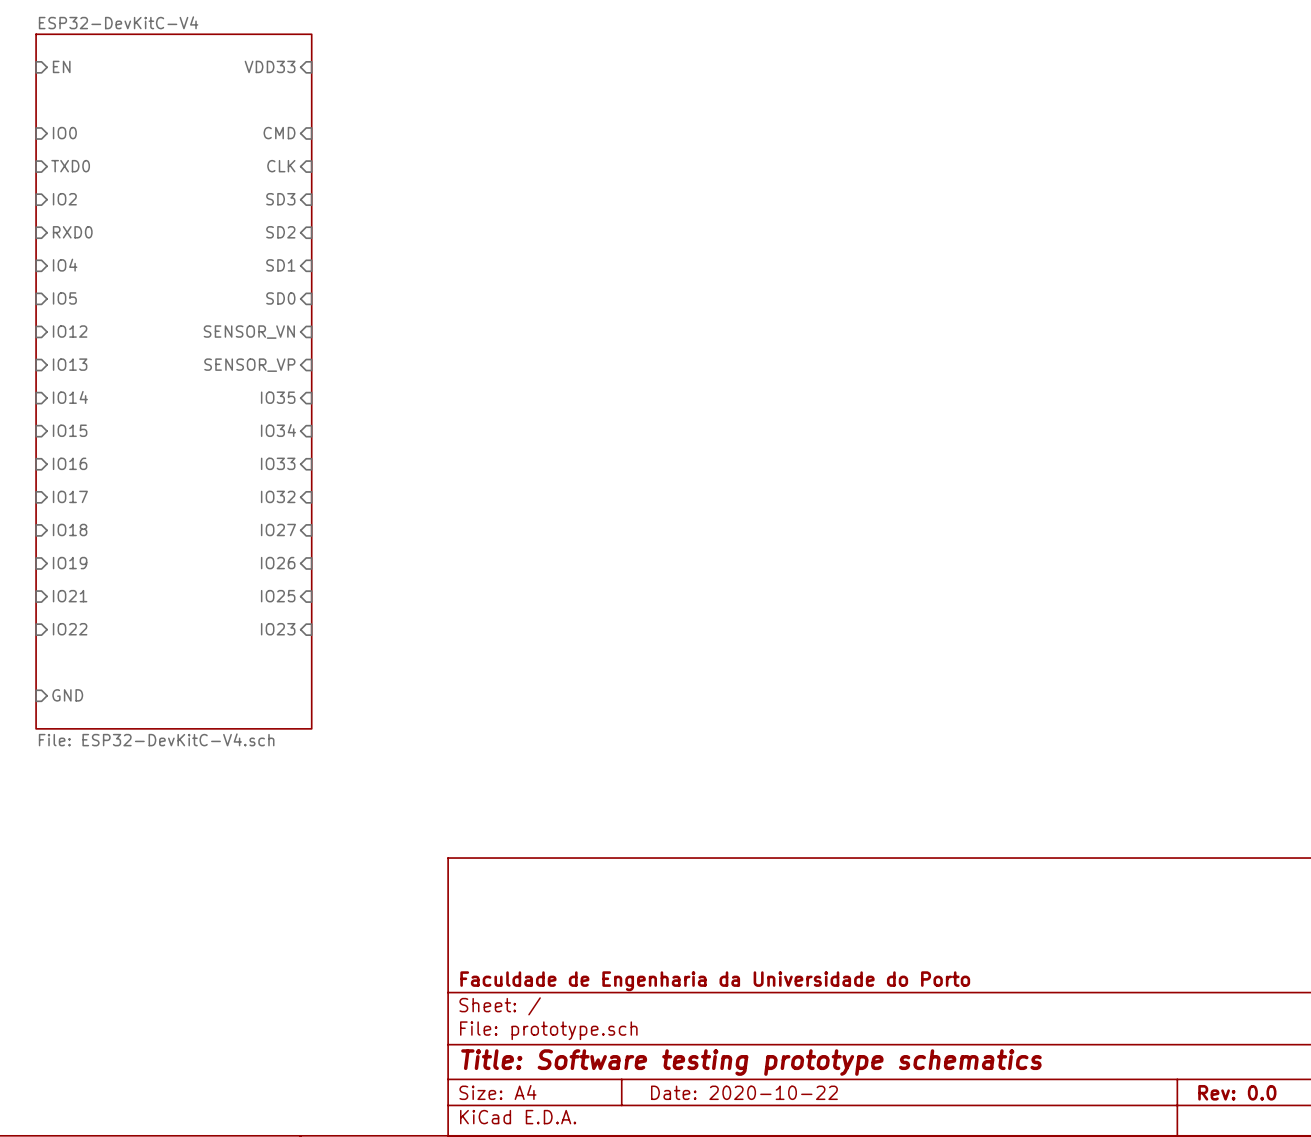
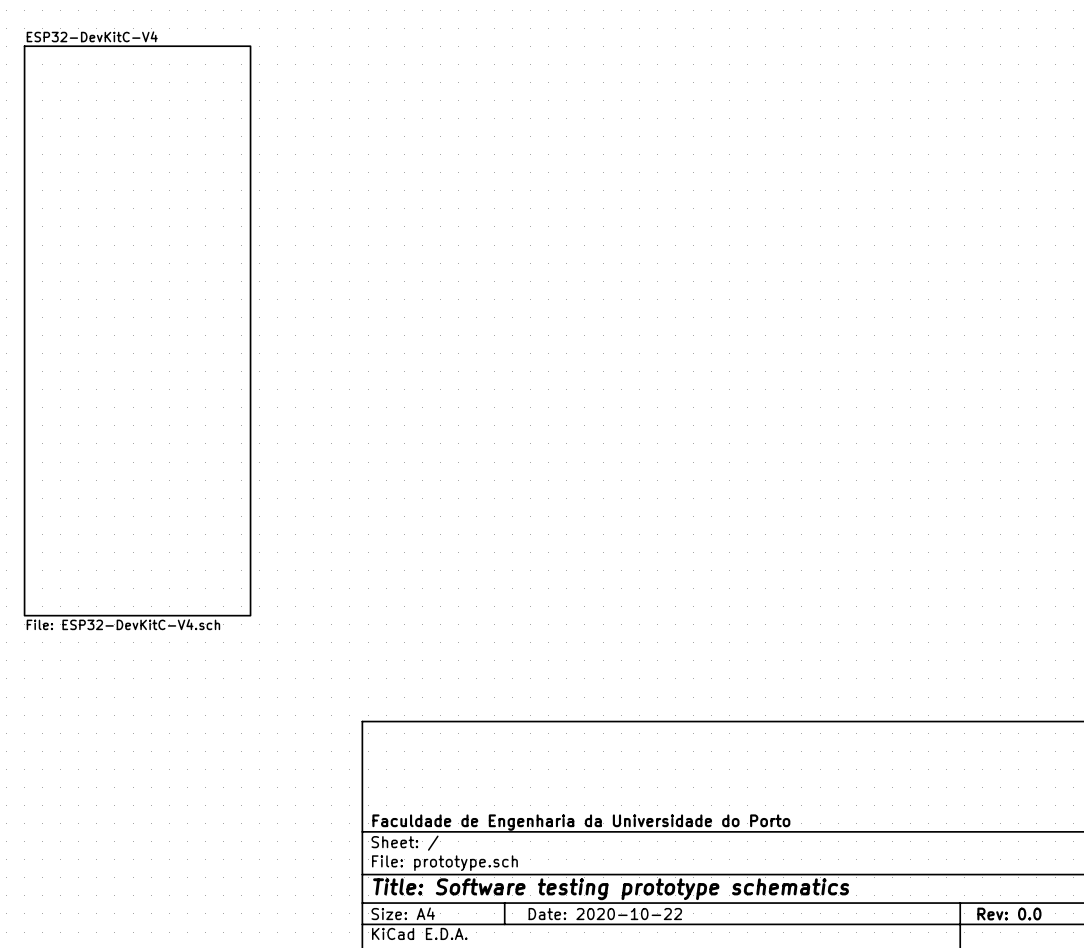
sheet pin: EN (61, 66) -> none
sheet pin: VDD33 (270, 66) -> none
sheet pin: IO0 (64, 133) -> none
sheet pin: CMD (279, 133) -> none
sheet pin: TXD0 (70, 166) -> none
sheet pin: CLK (281, 166) -> none
sheet pin: IO2 (64, 199) -> none
sheet pin: SD3 (280, 199) -> none
sheet pin: RXD0 (72, 232) -> none
sheet pin: SD2 (280, 232) -> none
sheet pin: IO4 (65, 265) -> none
sheet pin: SD1 (280, 265) -> none
sheet pin: IO5 (64, 298) -> none
sheet pin: SD0 (280, 298) -> none
sheet pin: IO12 (70, 331) -> none
sheet pin: SENSOR_VN (249, 332) -> none
sheet pin: IO13 (70, 364) -> none
sheet pin: SENSOR_VP (249, 365) -> none
sheet pin: IO14 (70, 397) -> none
sheet pin: IO35 (278, 397) -> none
sheet pin: IO15 (70, 430) -> none
sheet pin: IO34 (278, 430) -> none
sheet pin: IO16 (70, 463) -> none
sheet pin: IO33 (278, 463) -> none
sheet pin: IO17 (70, 496) -> none
sheet pin: IO32 (278, 496) -> none
sheet pin: IO18 (70, 529) -> none
sheet pin: IO27 (278, 529) -> none
sheet pin: IO19 (70, 563) -> none
sheet pin: IO26 (278, 563) -> none
sheet pin: IO21 (70, 596) -> none
sheet pin: IO25 (278, 596) -> none
sheet pin: IO22 (70, 629) -> none
sheet pin: IO23 (278, 629) -> none
sheet pin: GND (67, 695) -> none

